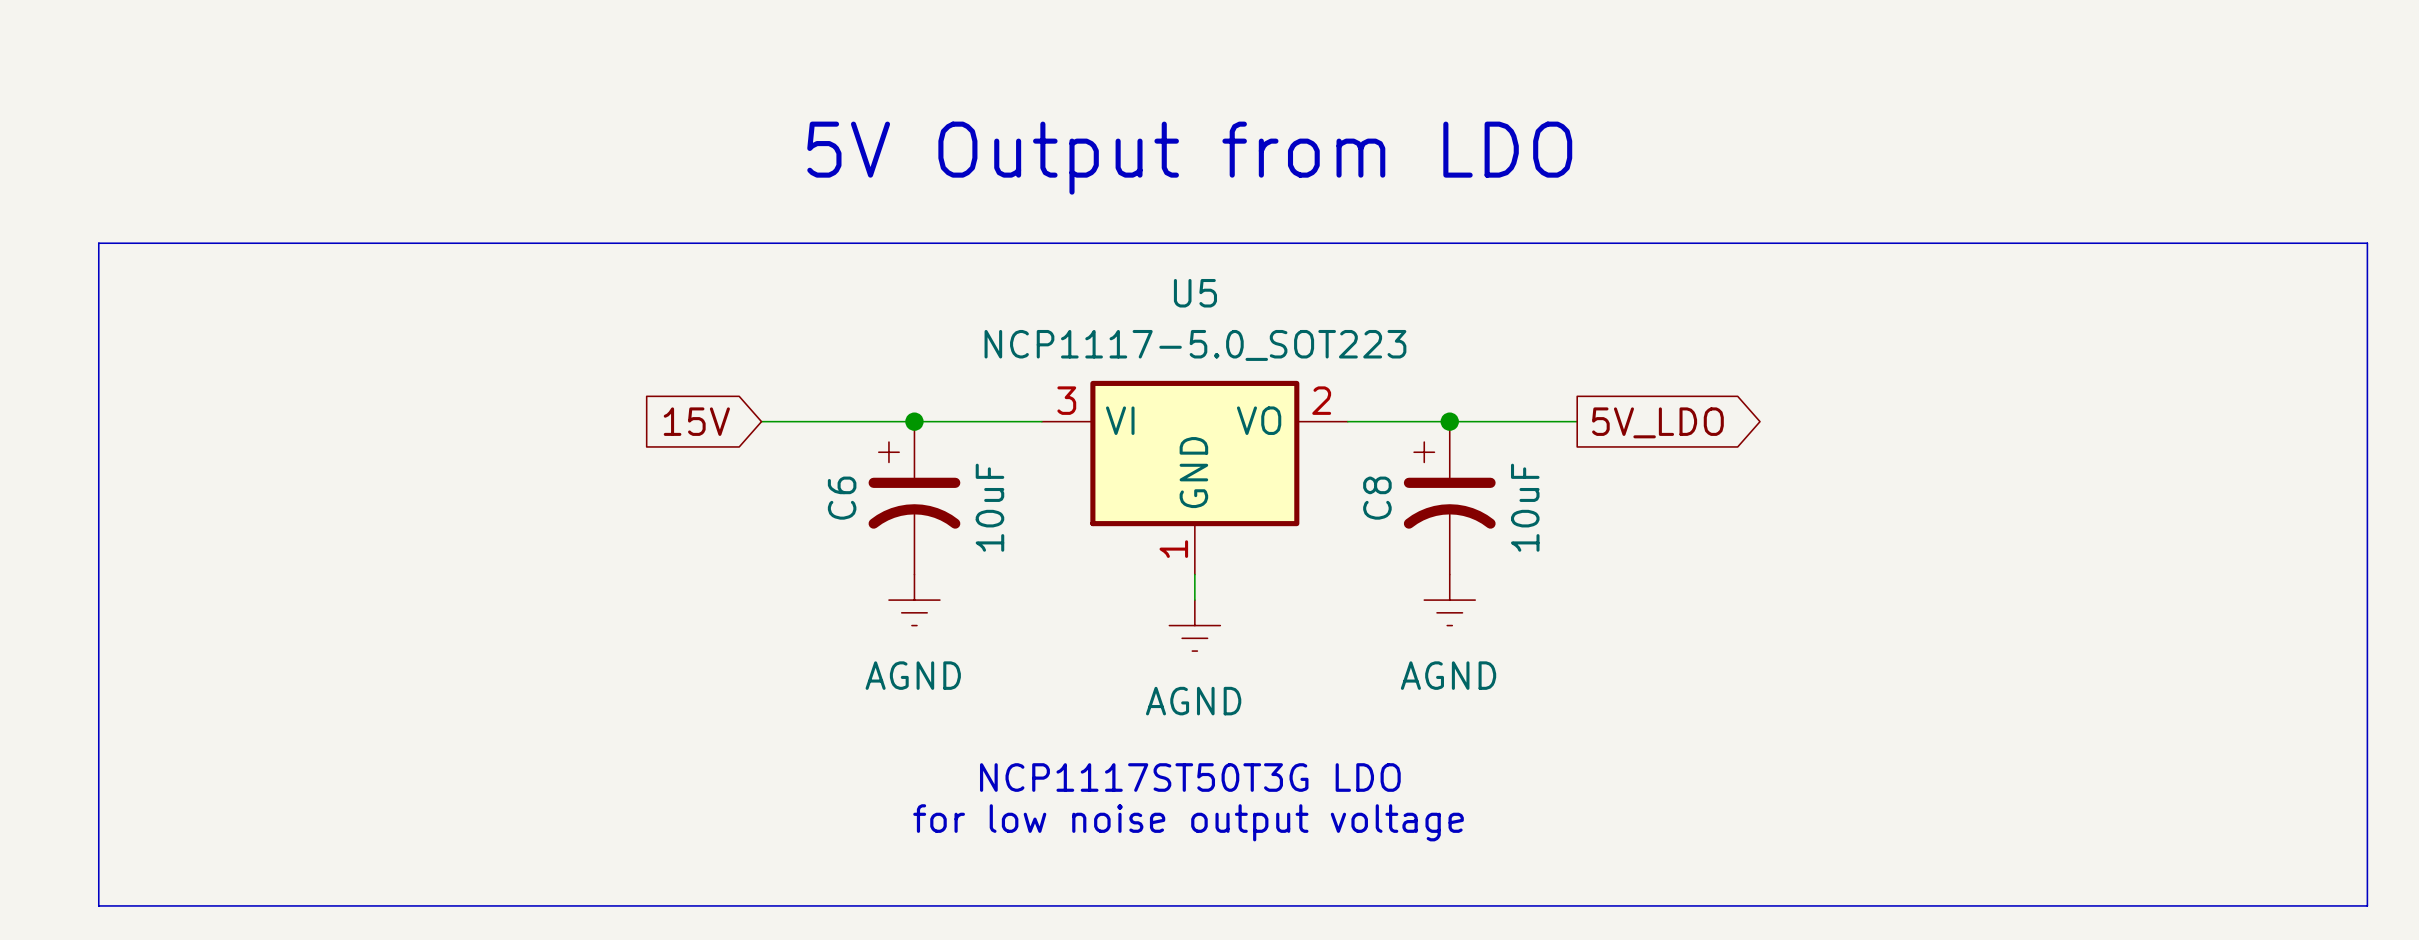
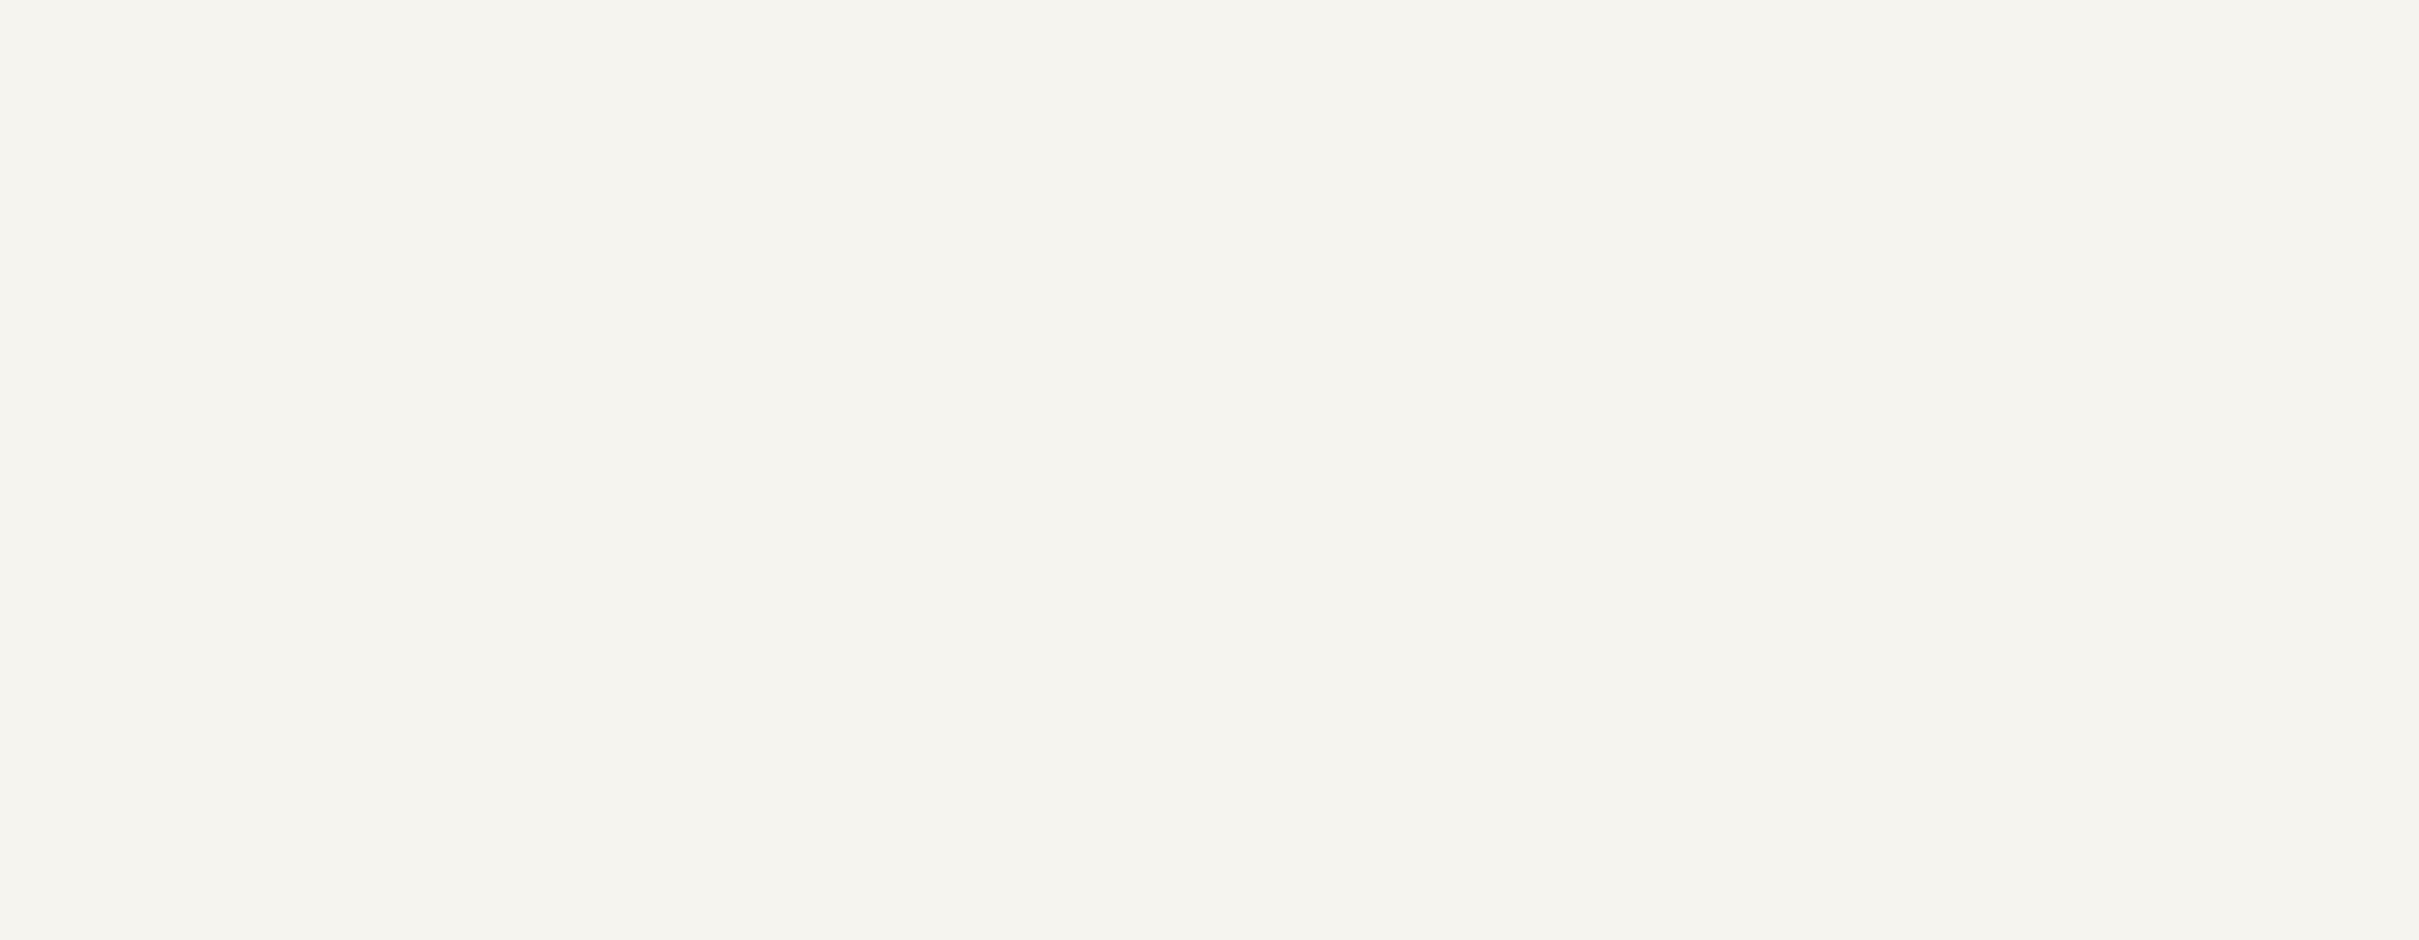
text: 5V Output from LDO (1189, 158) -> none
line: (98, 243) (2367, 243) (2367, 905) (98, 905) (98, 243) -> none
global label: 15V (696, 421) -> none
wire: (761, 421) (1041, 421) -> none
junction: (914, 421) -> none
wire: (1347, 421) (1577, 421) -> none
junction: (1449, 421) -> none
global label: 5V_LDO (1657, 422) -> none
U5: NCP1117-5.0_SOT223 (1194, 477) -> none
C6: 10uF (914, 498) -> none
C8: 10uF (1449, 498) -> none
wire: (1194, 574) (1194, 600) -> none
power symbol: AGND (914, 600) -> none
power symbol: AGND (1449, 600) -> none
power symbol: AGND (1194, 625) -> none
text: NCP1117ST50T3G LDO (1190, 777) -> none
text: for low noise output voltage (1188, 822) -> none

